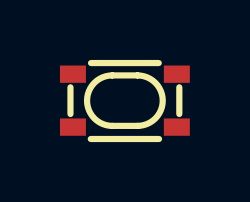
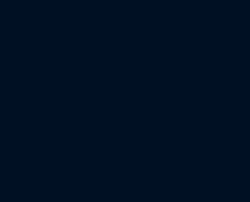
part: (124, 101) -> none

